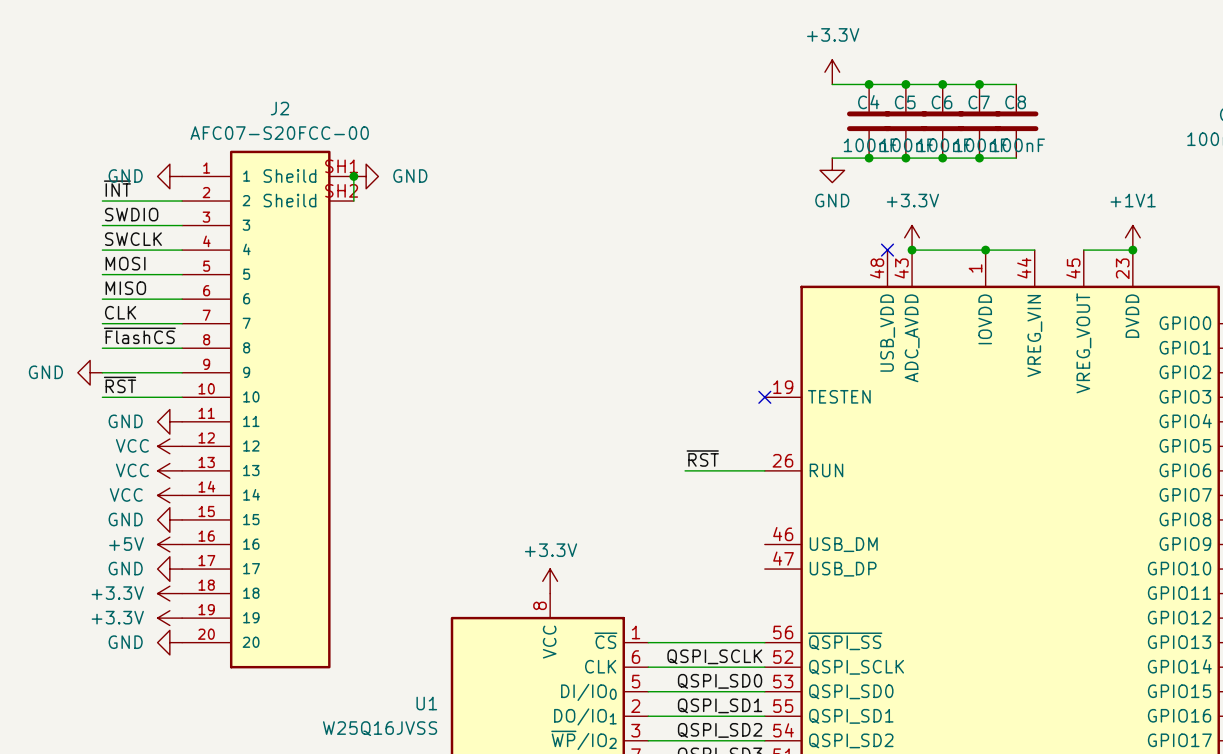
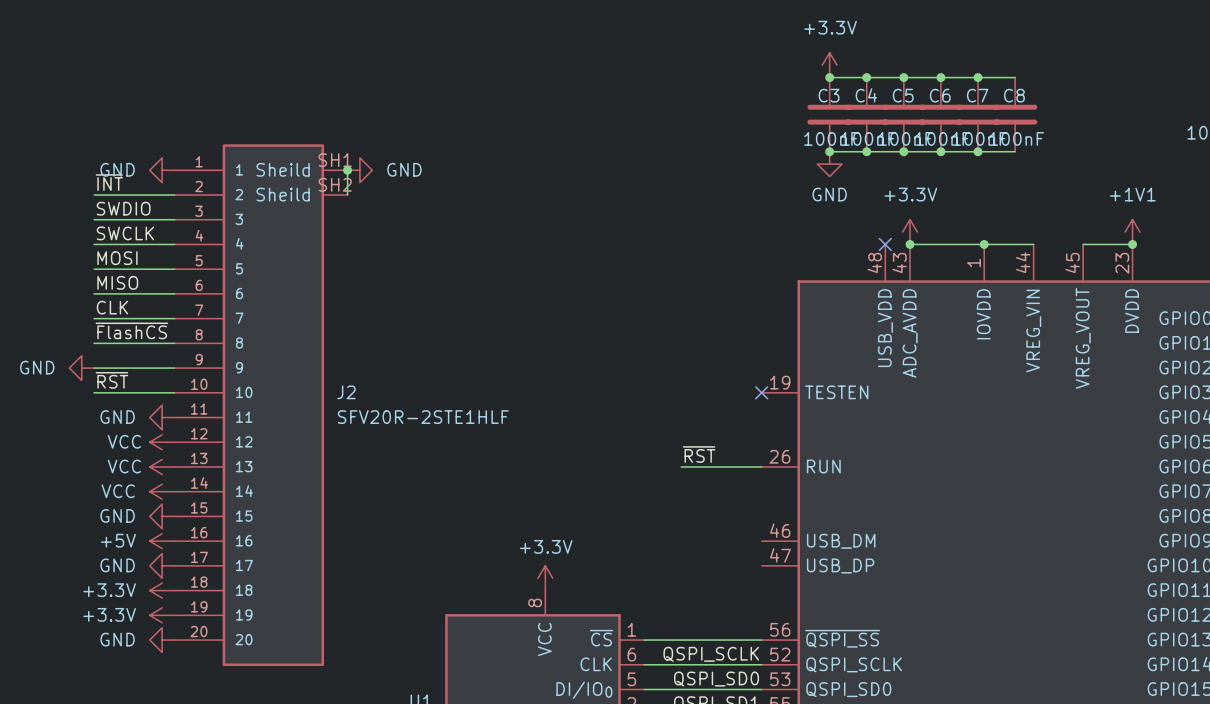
junction: none -> (829, 77)
J2 name position: J2 (279, 108) -> J2 (346, 392)
C3: none -> 100nF (829, 114)
J2 value: AFC07-S20FCC-00 (279, 133) -> SFV20R-2STE1HLF (423, 417)
junction: none -> (829, 151)

